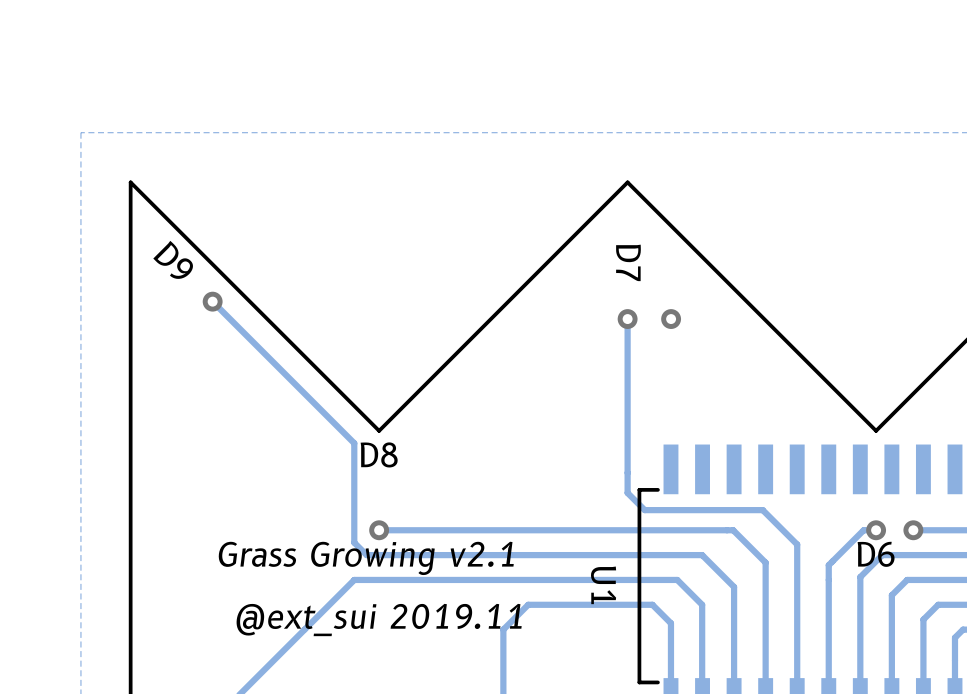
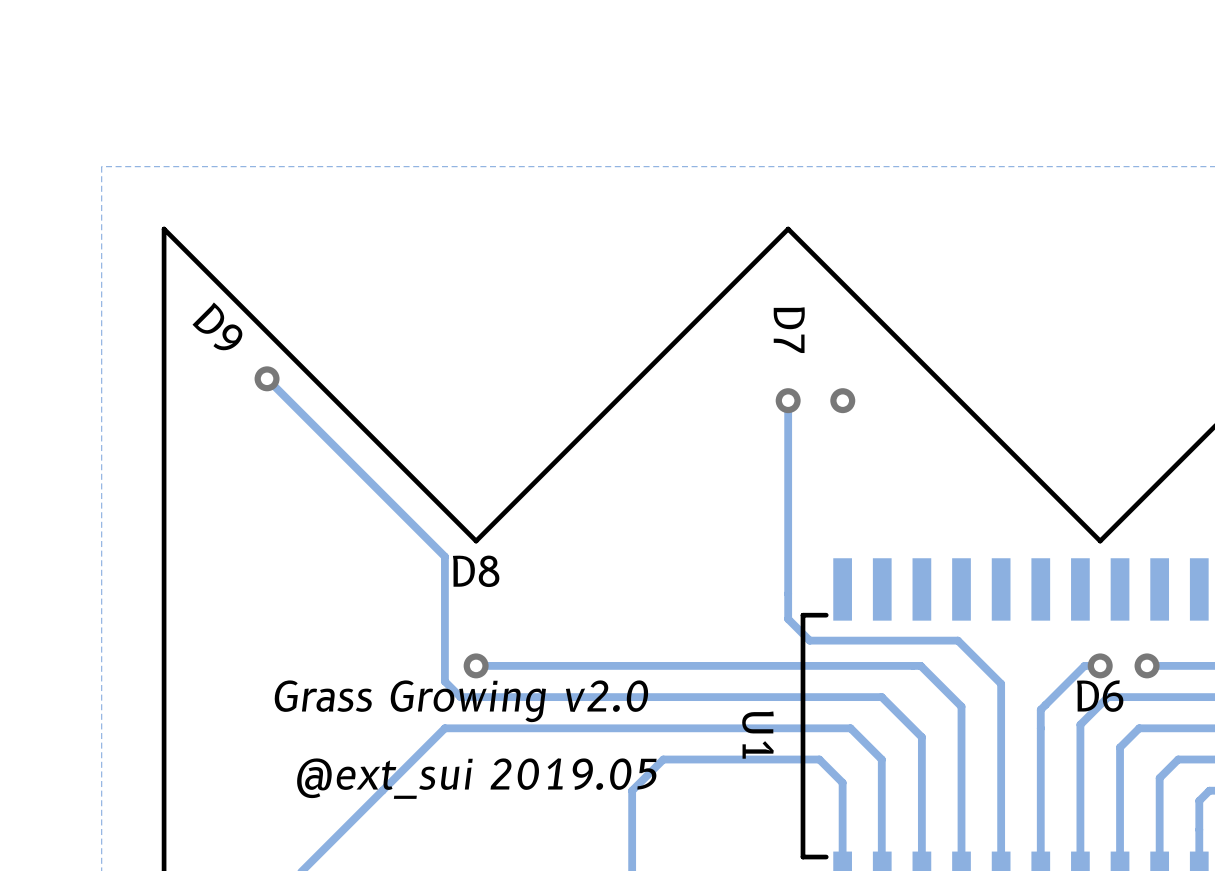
text: Grass Growing v2.1 (366, 558) -> Grass Growing v2.0 (461, 701)
text: @ext_sui 2019.11 (379, 620) -> @ext_sui 2019.05 (476, 778)

